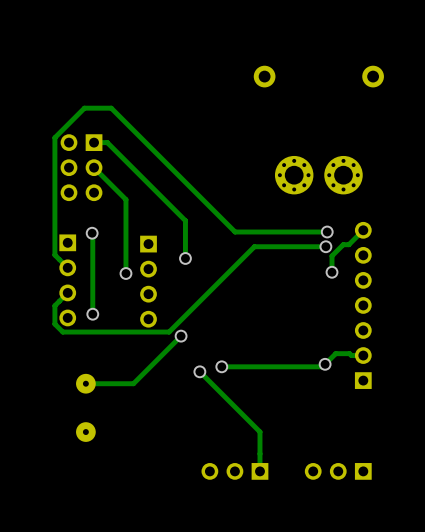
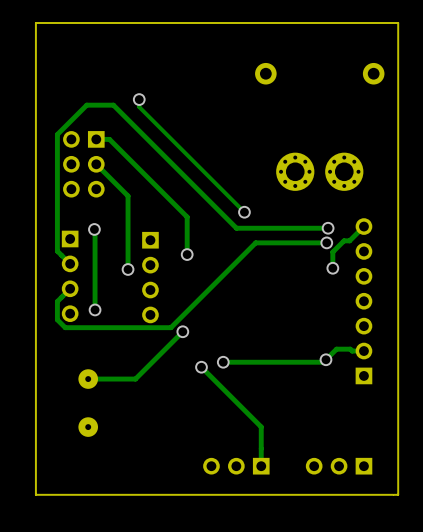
track: none -> (139, 99) (139, 107) (244, 212)
via: none -> (139, 99)
via: none -> (244, 212)
board edge: none -> (393, 494) (398, 494) (398, 22) (35, 22) (35, 494) (393, 494)

